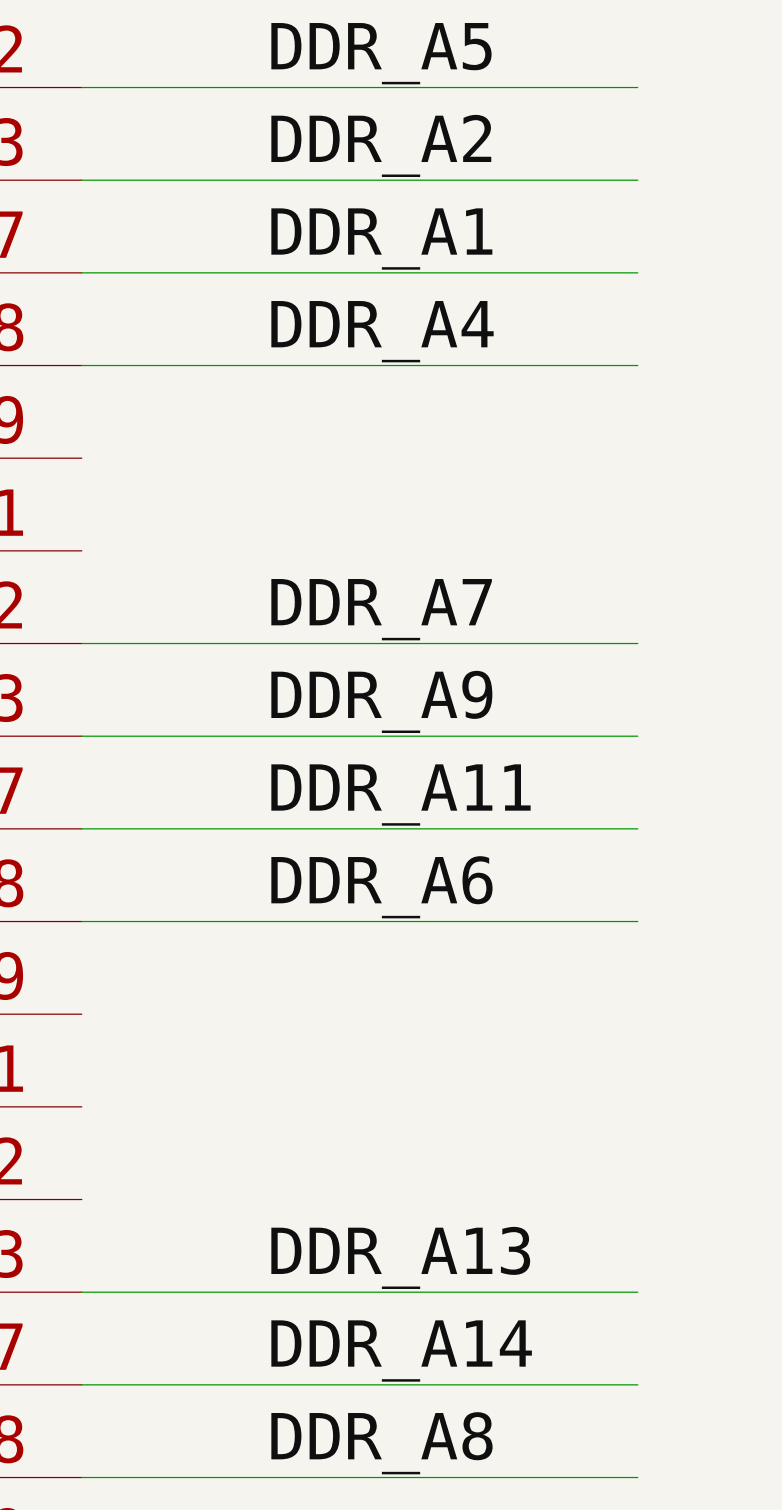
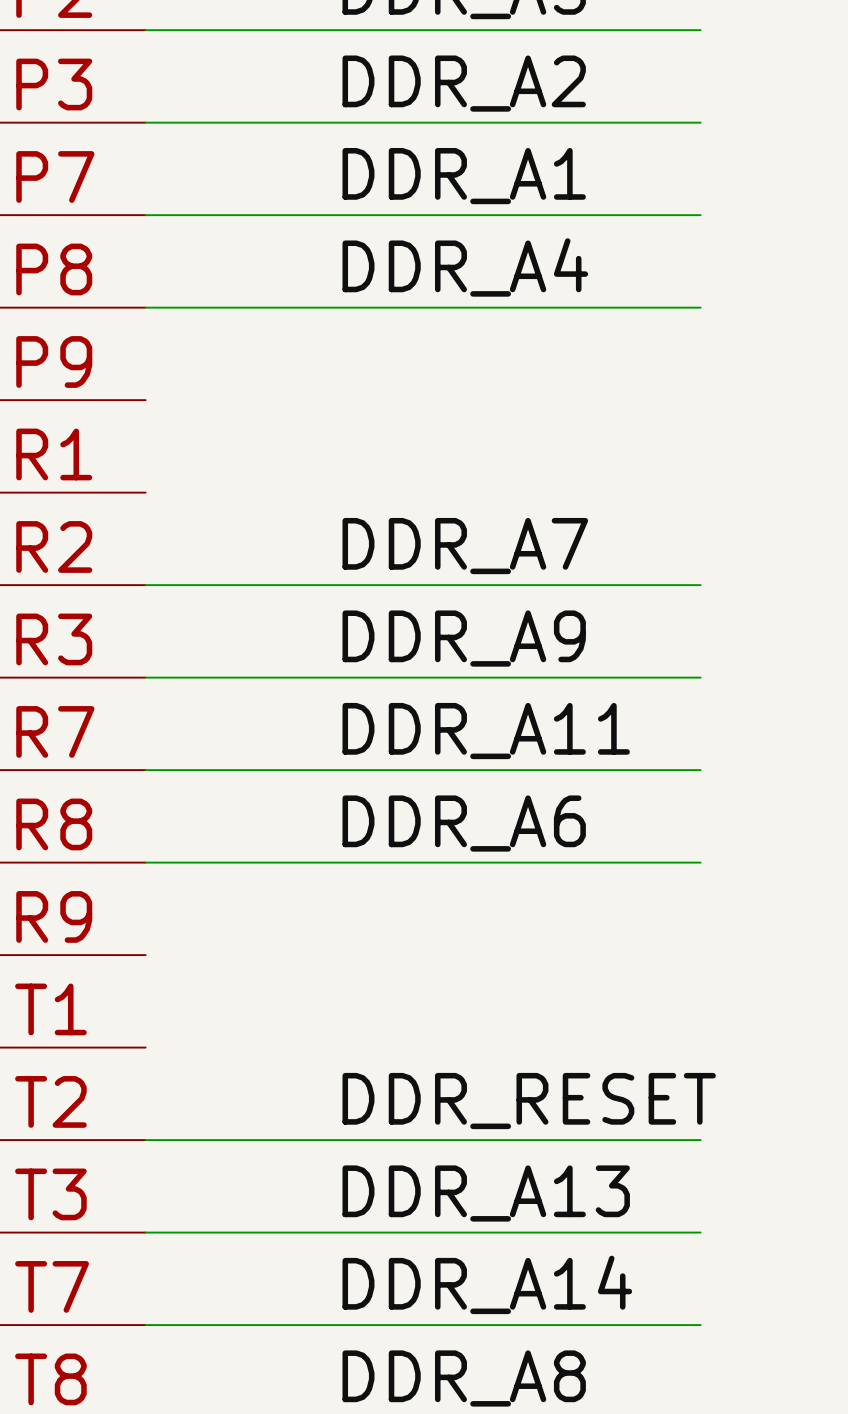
label: none -> DDR_RESET (529, 1101)
wire: none -> (145, 1140) (700, 1140)

